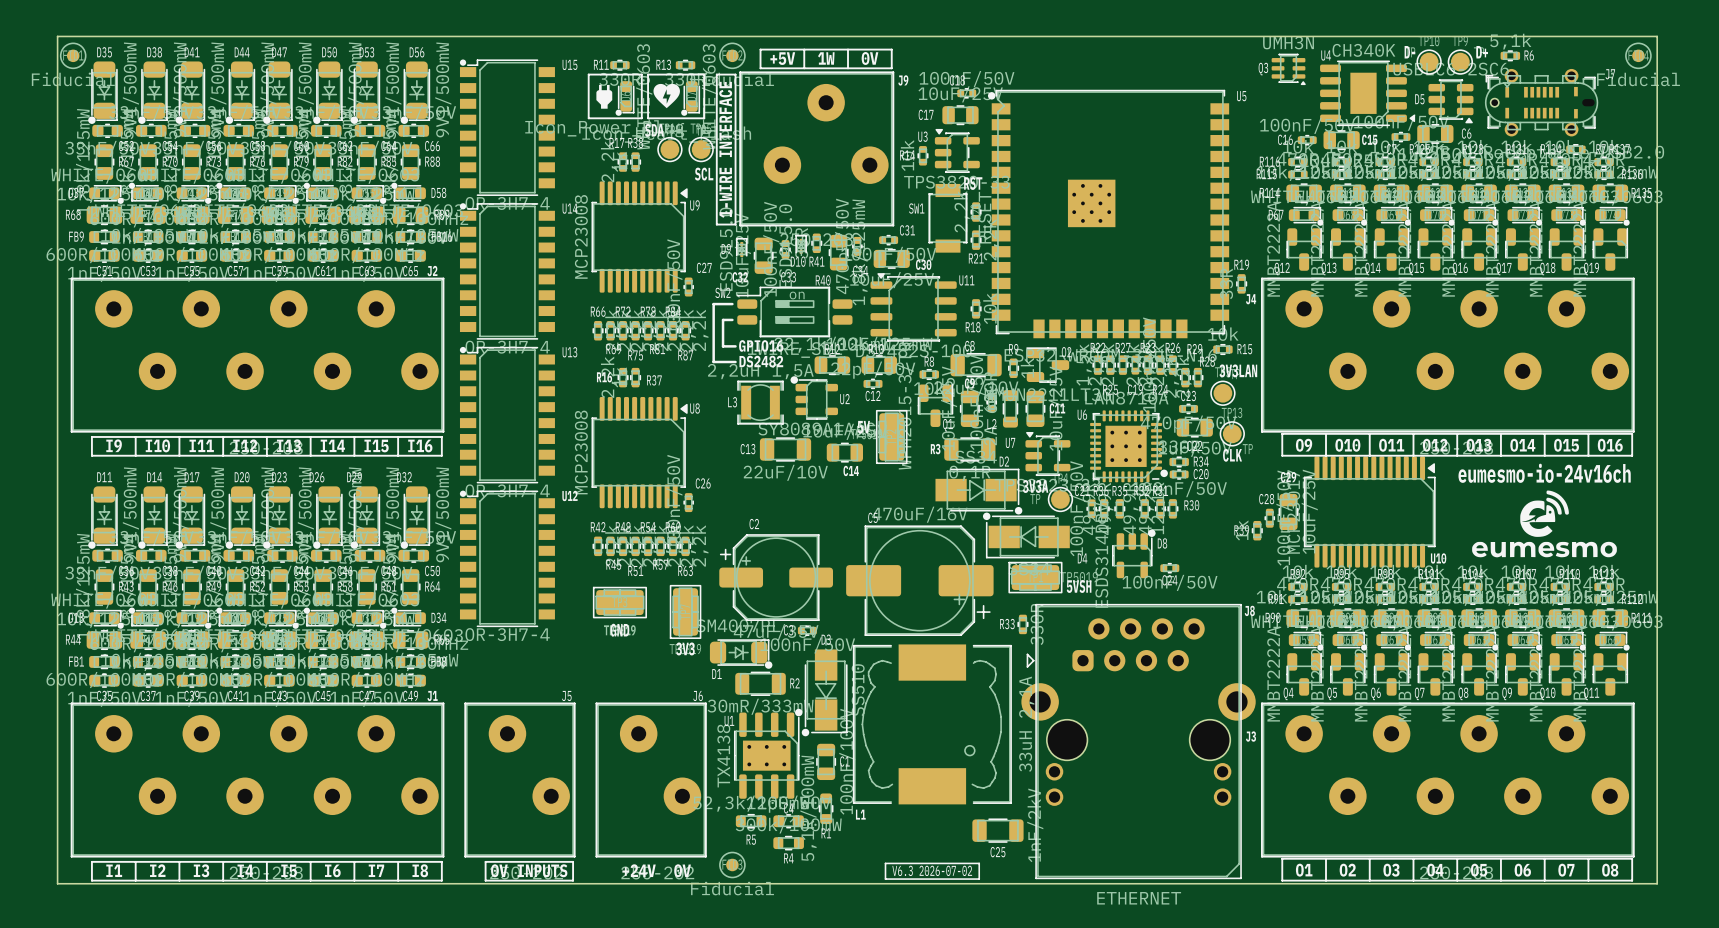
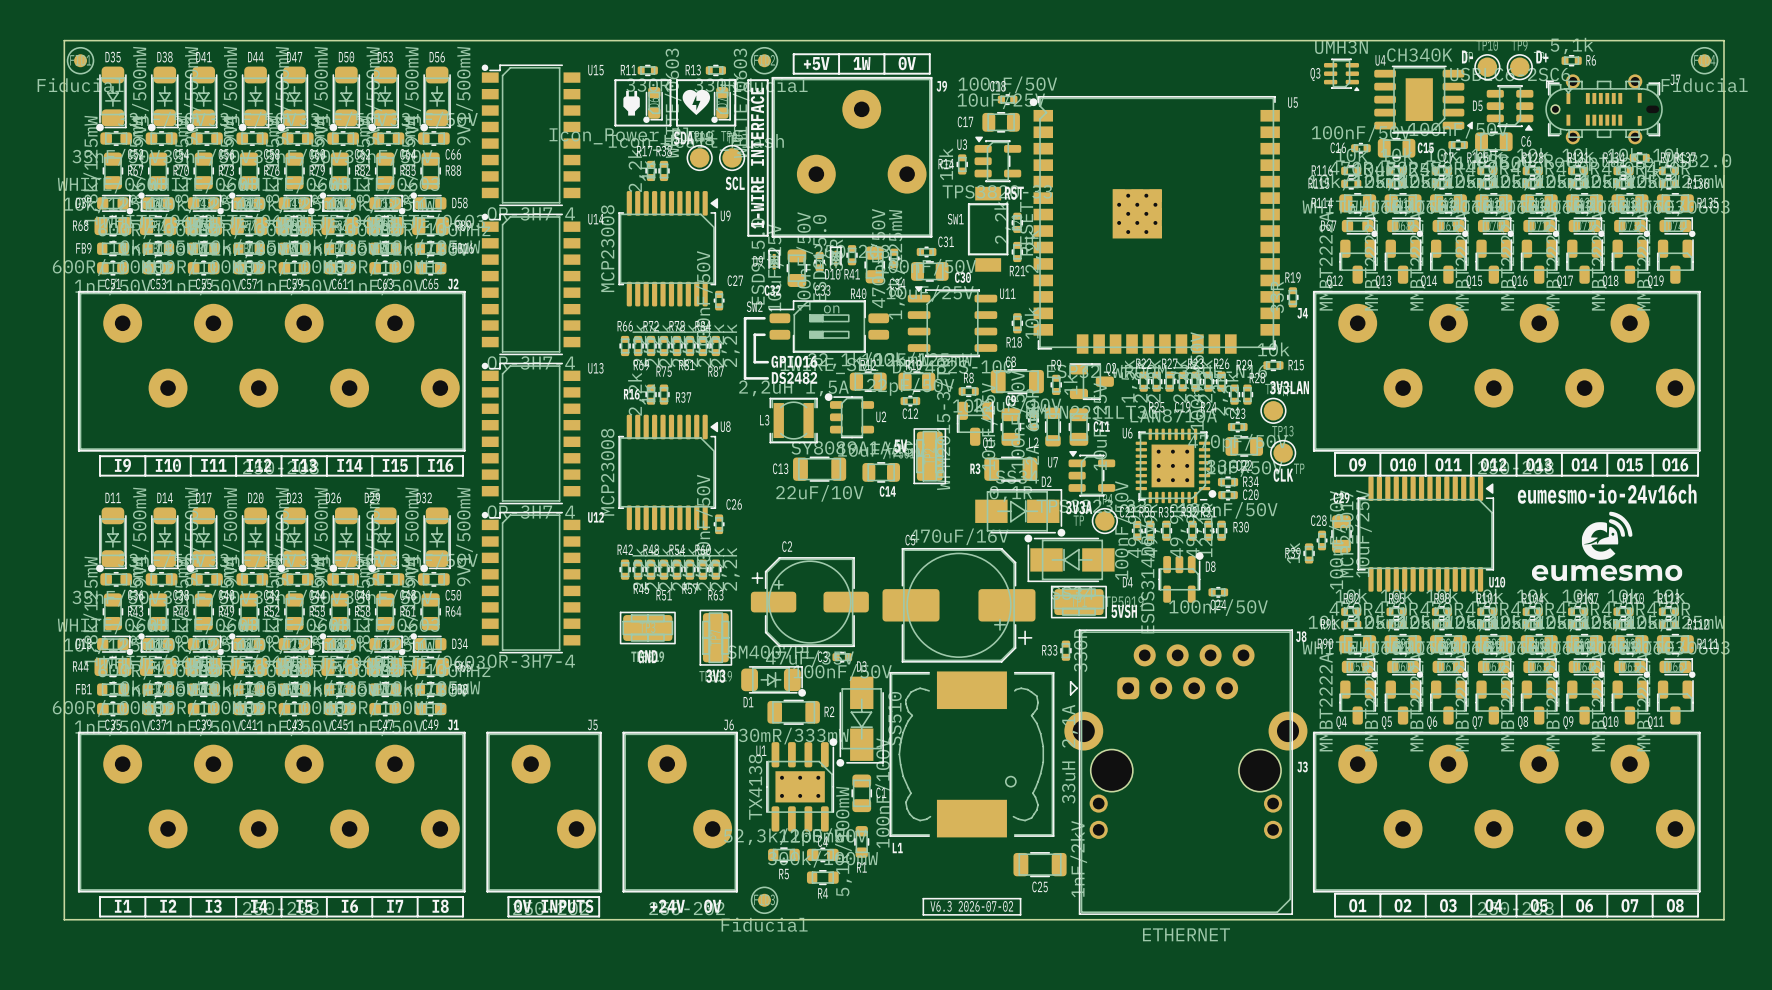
SW1 footprint: [928, 183, 968, 253] -> [967, 186, 1009, 272]

